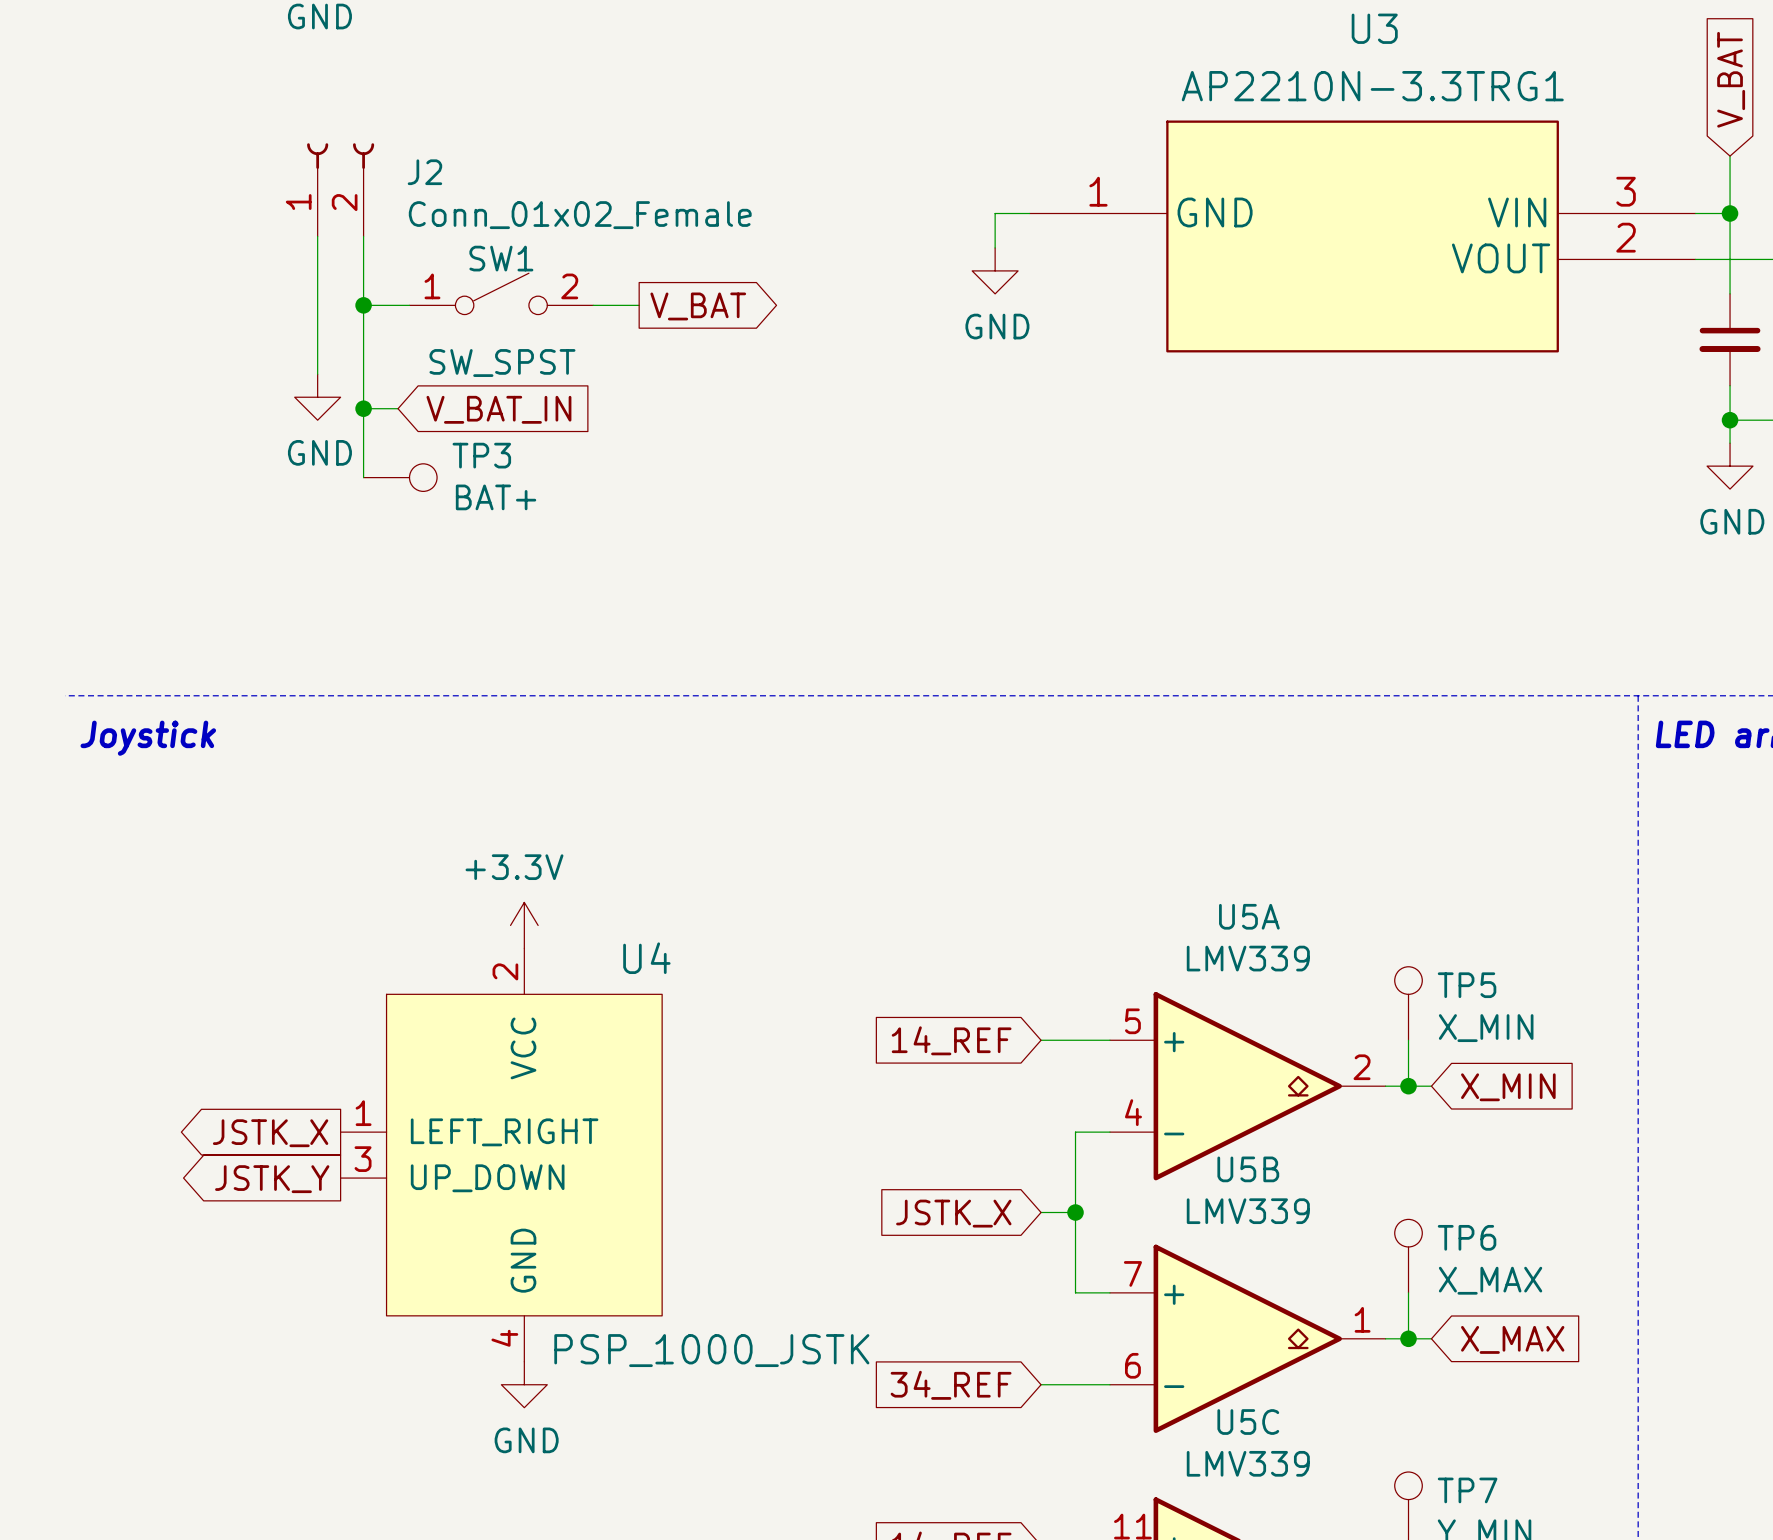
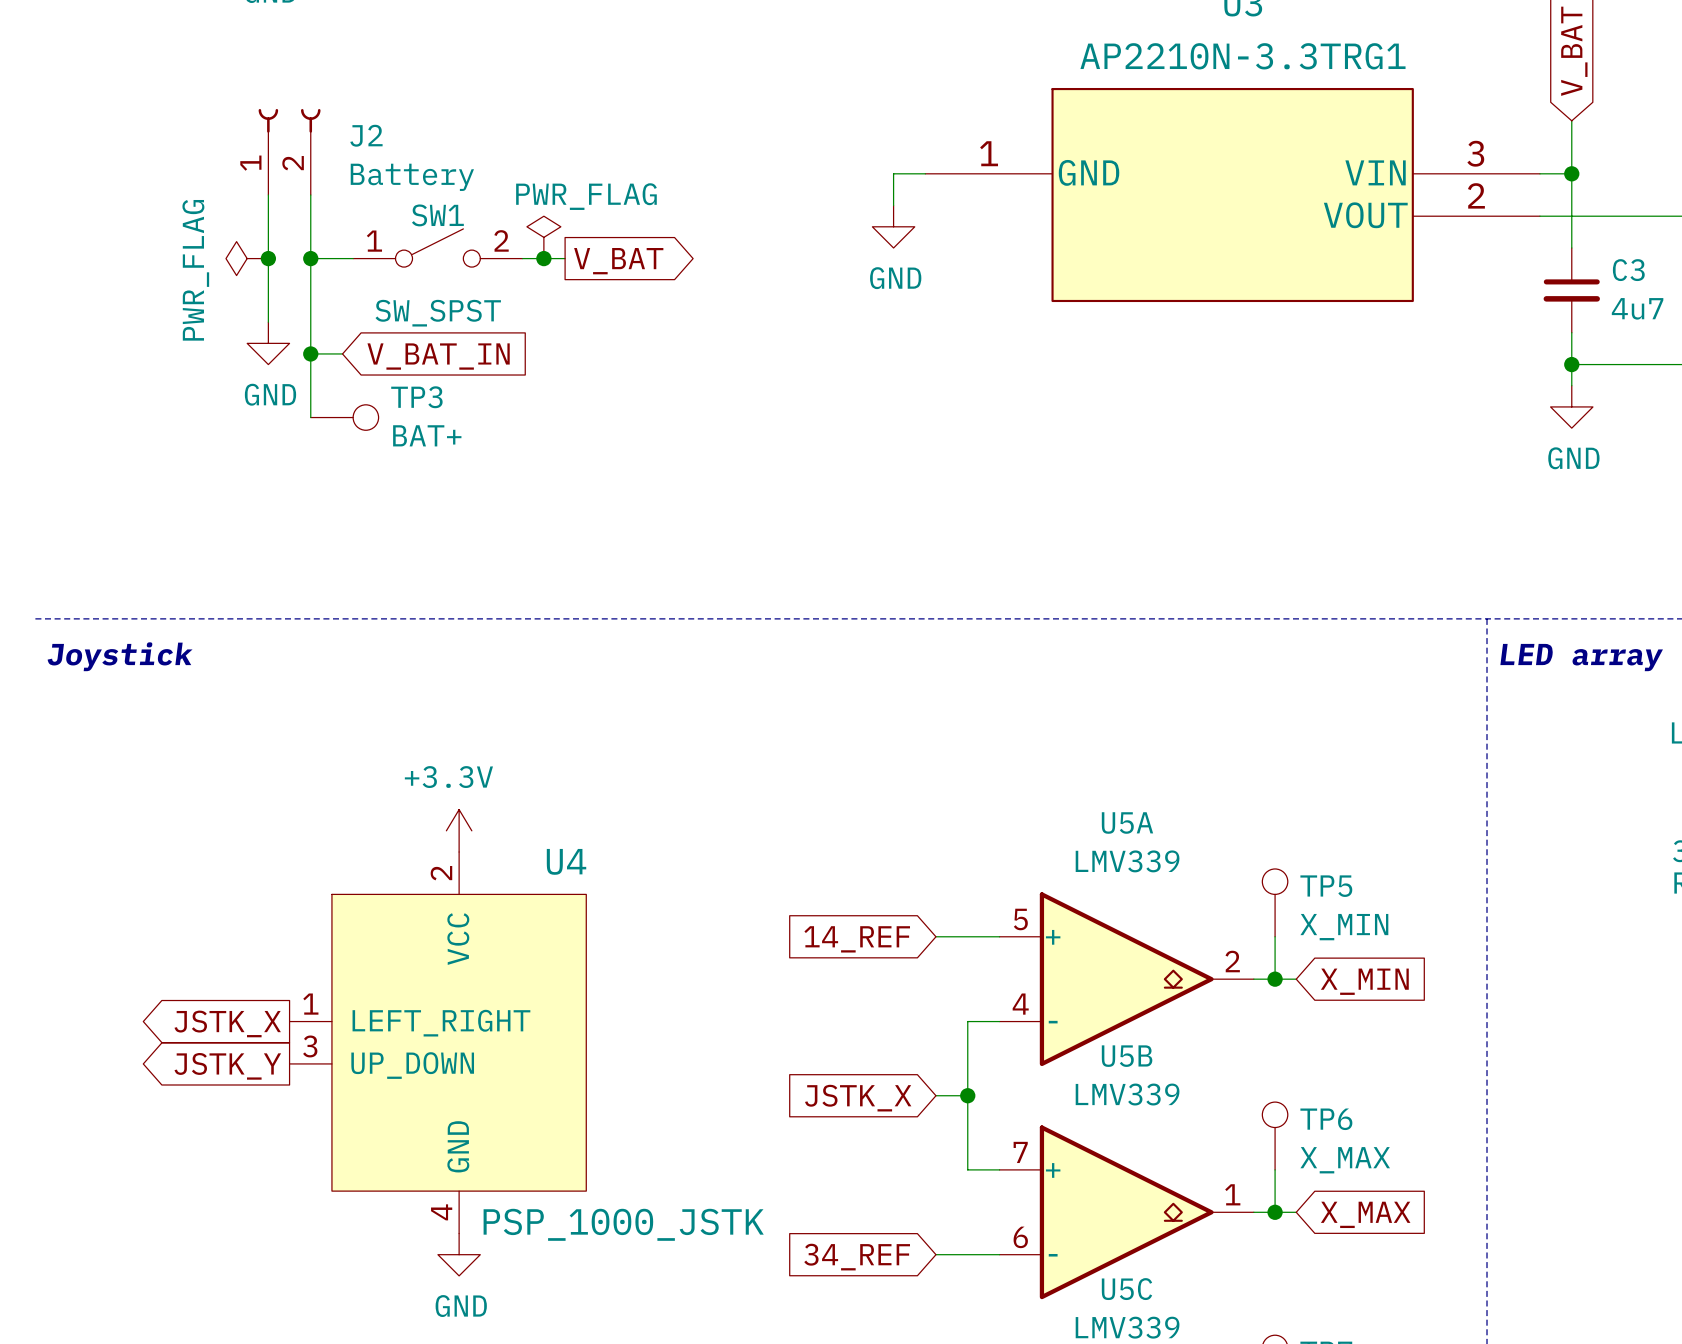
J2 value: Conn_01x02_Female (580, 215) -> Battery (412, 177)
power symbol: none -> PWR_FLAG (543, 237)
power symbol: none -> PWR_FLAG (247, 258)
junction: none -> (268, 258)
junction: none -> (543, 258)

